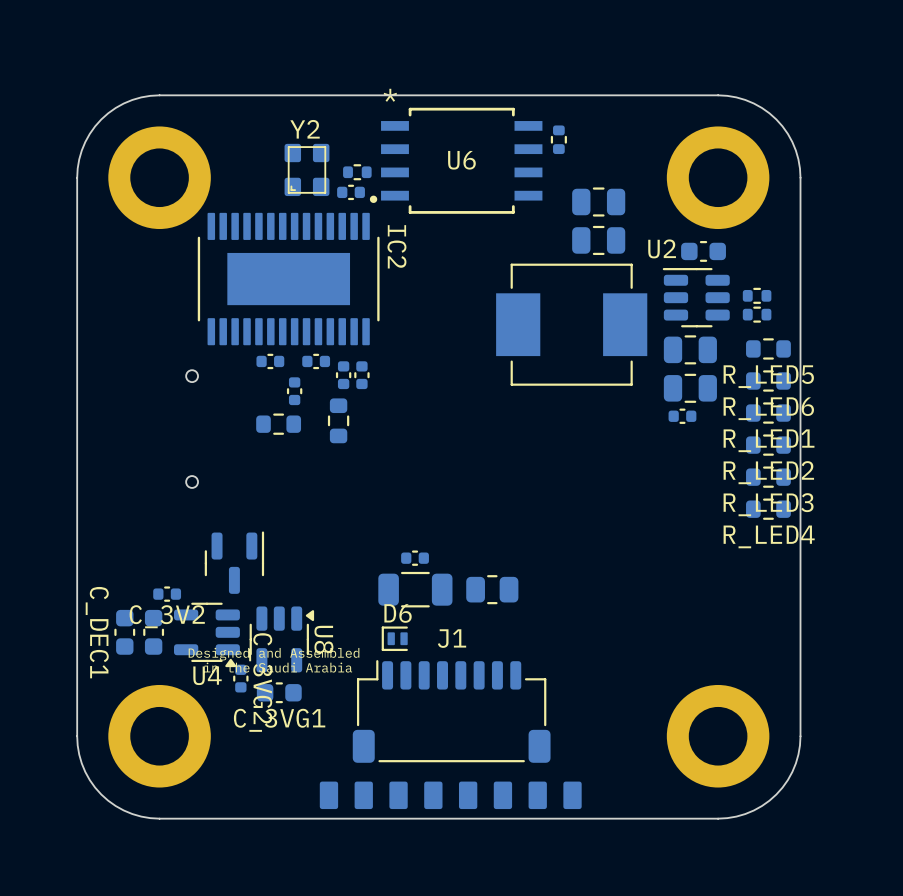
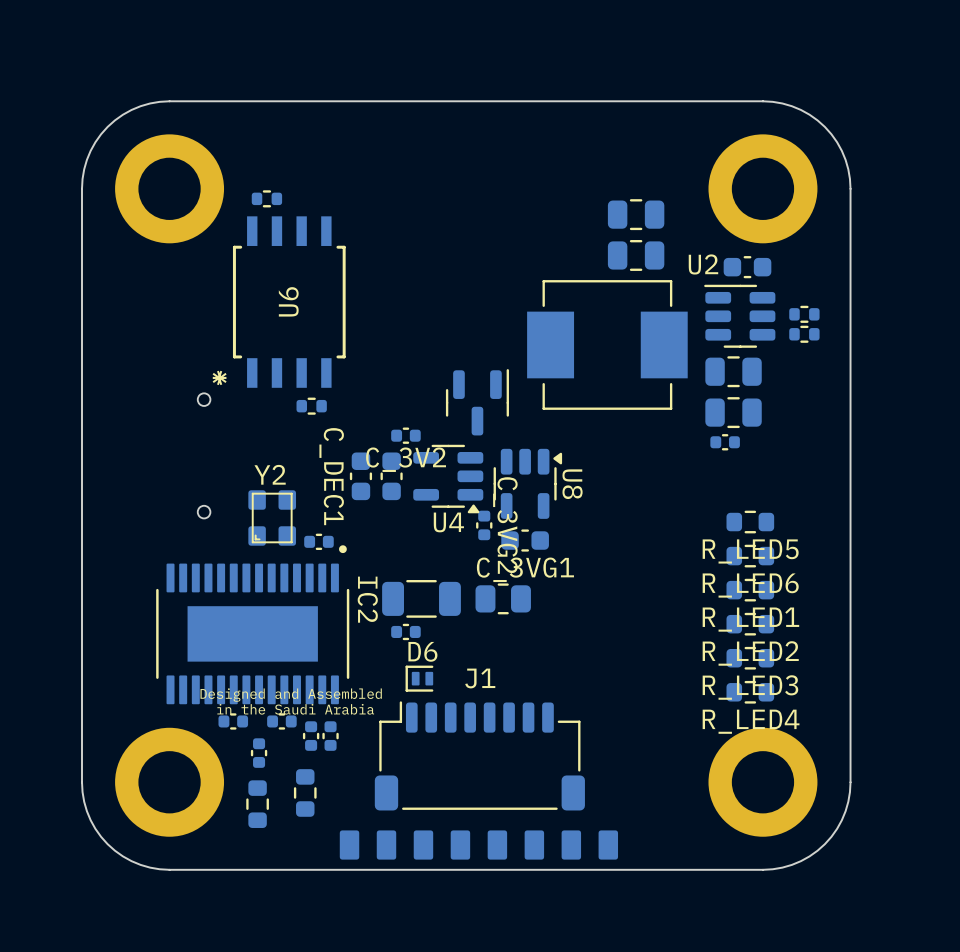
part: (558, 139) -> none
U6 rotation: 0° (461, 160) -> 90° counterclockwise (289, 302)
U6 position: (461, 160) -> (289, 302)
Y2 position: (306, 169) -> (272, 517)
part position: (357, 172) -> (266, 198)
part: (351, 192) -> none
IC2 position: (288, 270) -> (252, 624)
R_LED5 position: (768, 348) -> (750, 522)
part: (270, 361) -> none
part: (316, 361) -> none
part: (343, 375) -> none
part: (361, 375) -> none
part footprint: [286, 377, 303, 406] -> [296, 397, 327, 415]
R_LED6 position: (768, 381) -> (750, 556)
R_LED1 position: (768, 413) -> (750, 590)
part: (338, 420) -> none
part: (278, 424) -> none
R_LED2 position: (768, 445) -> (750, 624)
R_LED3 position: (768, 477) -> (750, 658)
part: none -> (318, 541)
R_LED4 position: (768, 509) -> (750, 692)
part position: (415, 558) -> (405, 631)
part position: (234, 562) -> (477, 402)
part position: (415, 589) -> (421, 598)
part position: (492, 589) -> (503, 598)
C_3V2 position: (167, 594) -> (405, 435)
C_DEC1 position: (124, 632) -> (360, 476)
part position: (153, 632) -> (391, 476)
U4 position: (206, 634) -> (448, 479)
U8 position: (281, 639) -> (527, 483)
C_3VG2 position: (240, 678) -> (484, 525)
part: none -> (233, 721)
part: none -> (281, 721)
C_3VG1 position: (279, 692) -> (525, 540)
part: none -> (311, 736)
part: none -> (330, 736)
part: none -> (259, 753)
part: none -> (305, 792)
part: none -> (257, 804)

